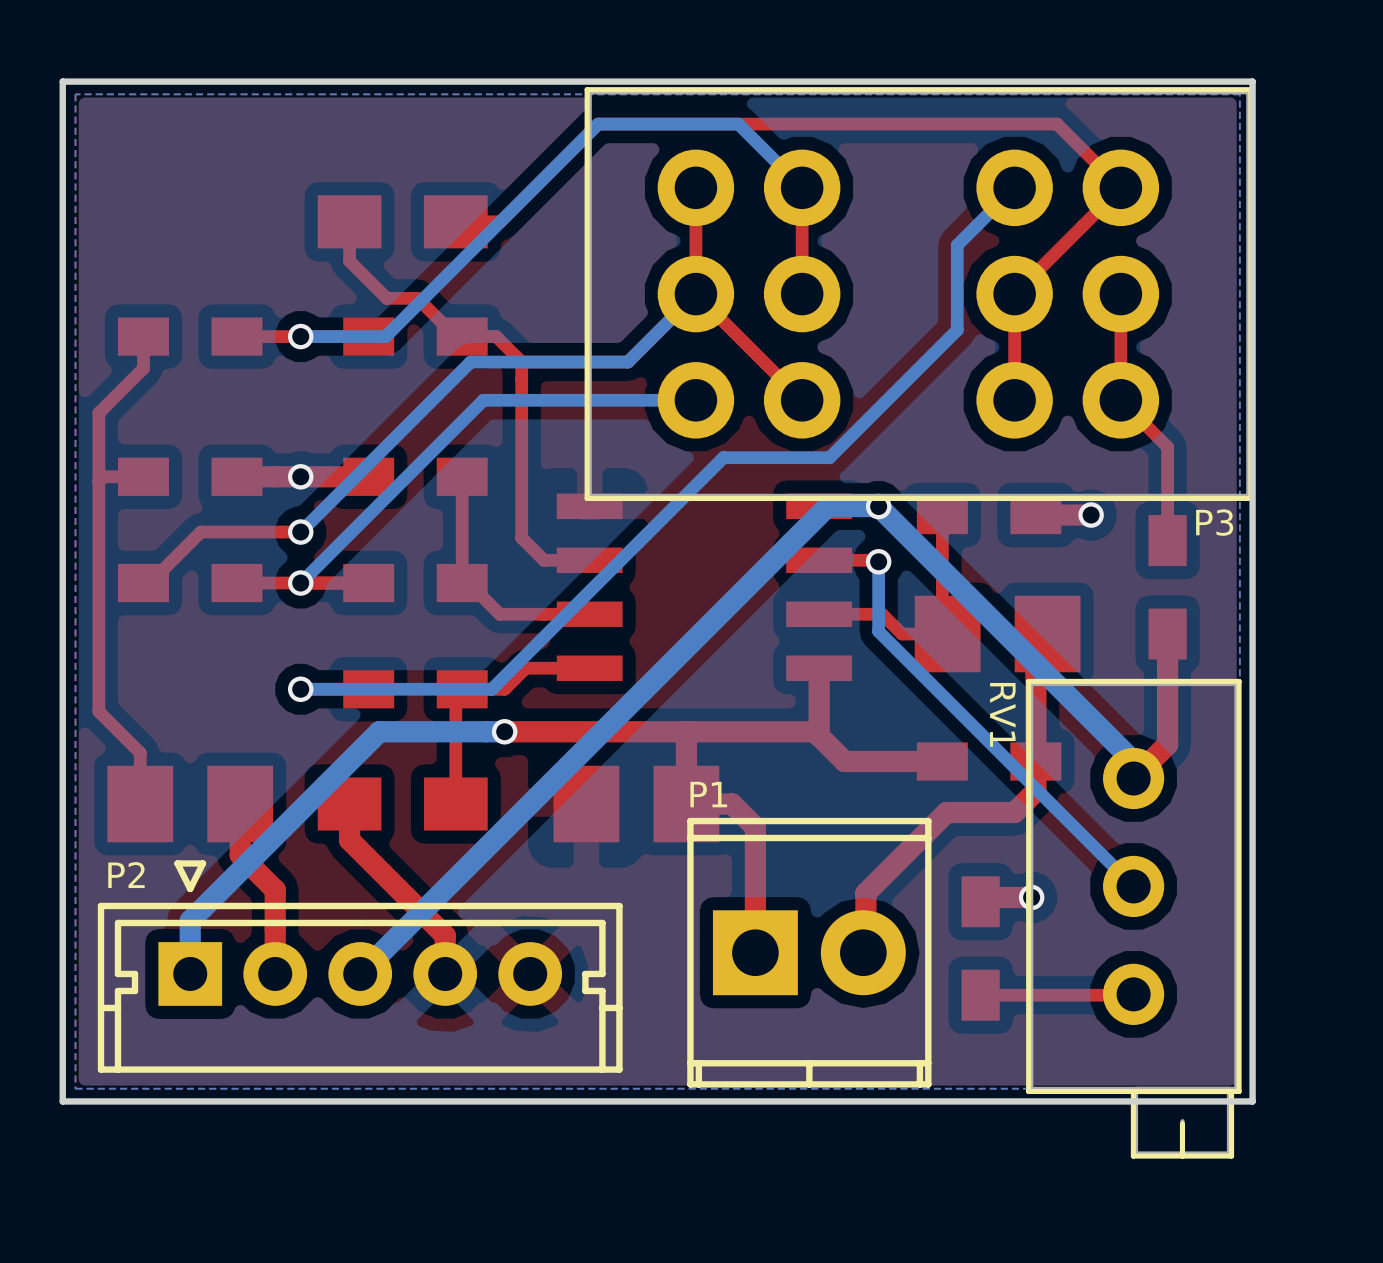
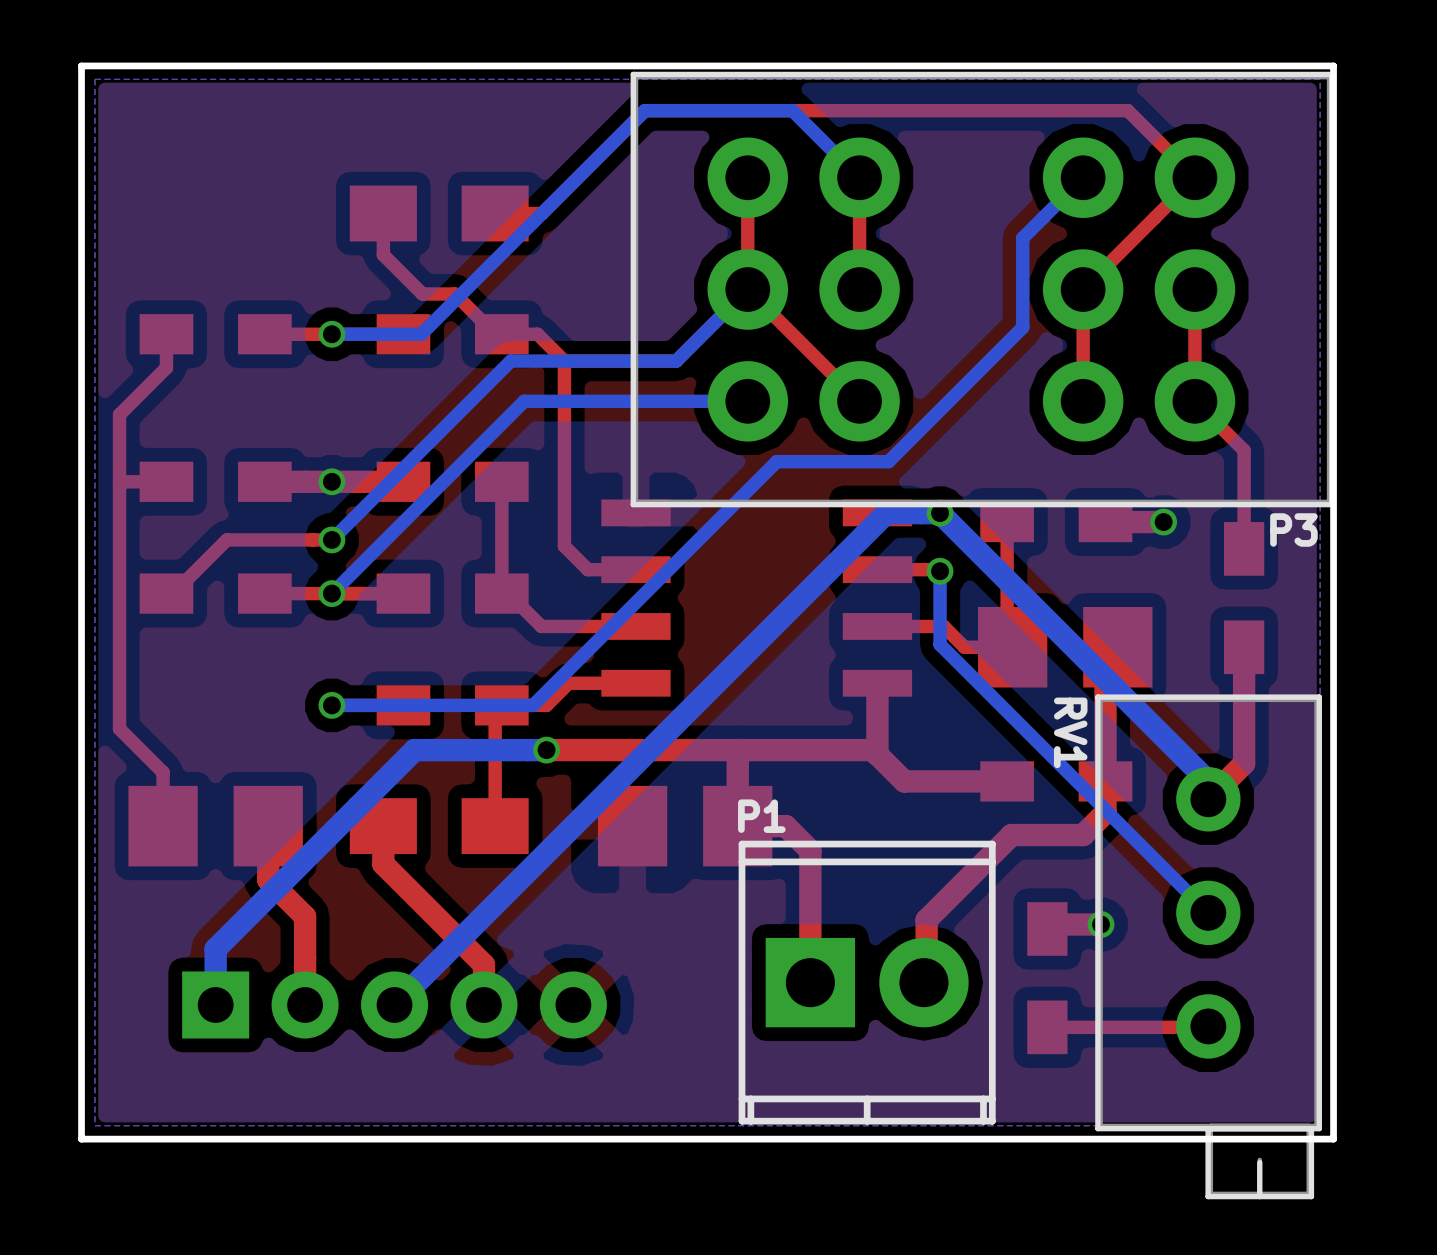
P2 side: bottom (360, 966) -> top (394, 1004)

